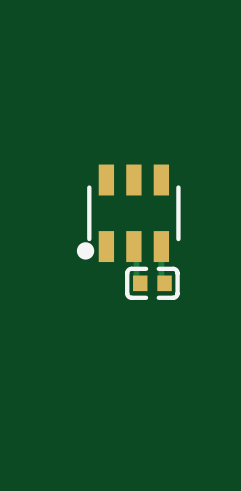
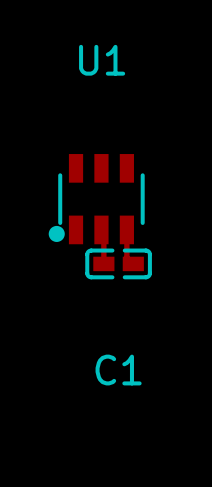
U1 name: none -> U1 (102, 60)
part: (152, 283) -> none
C1: none -> (118, 263)

